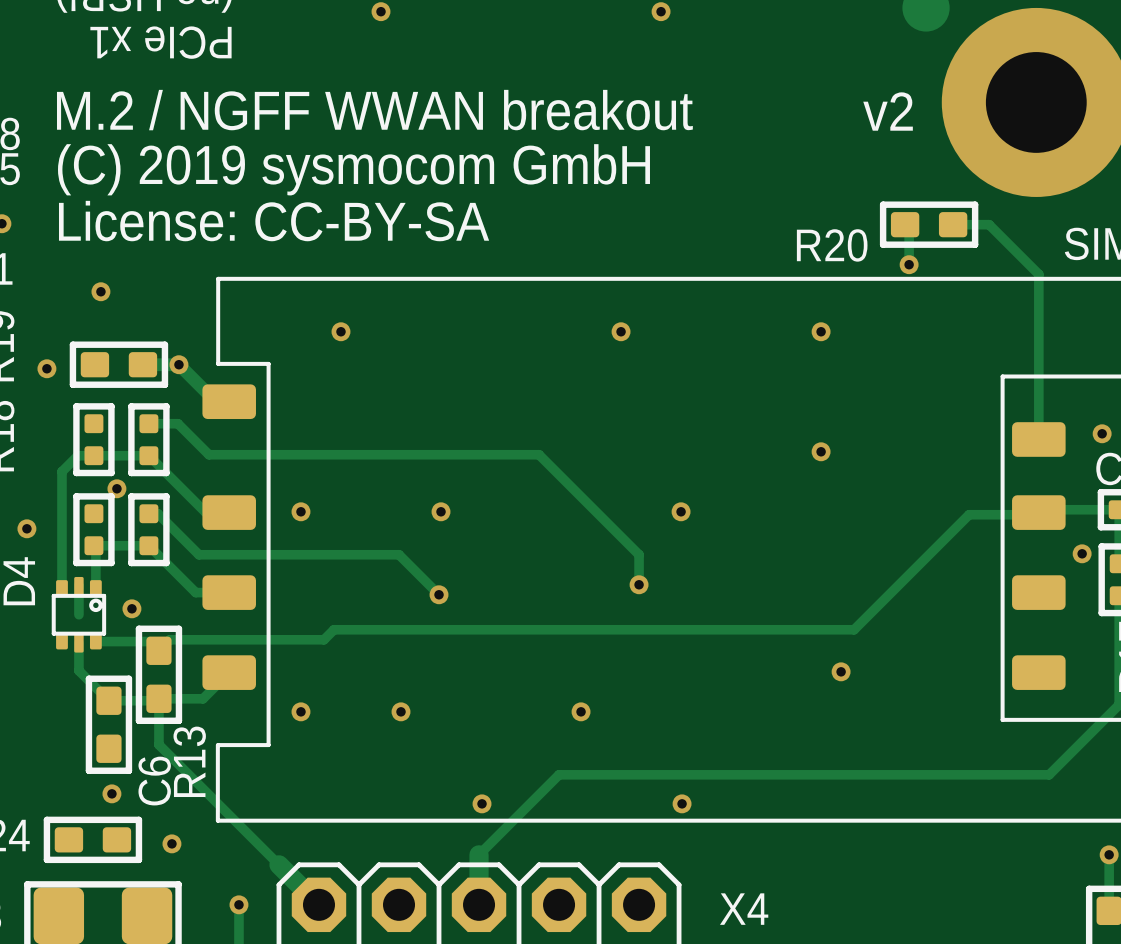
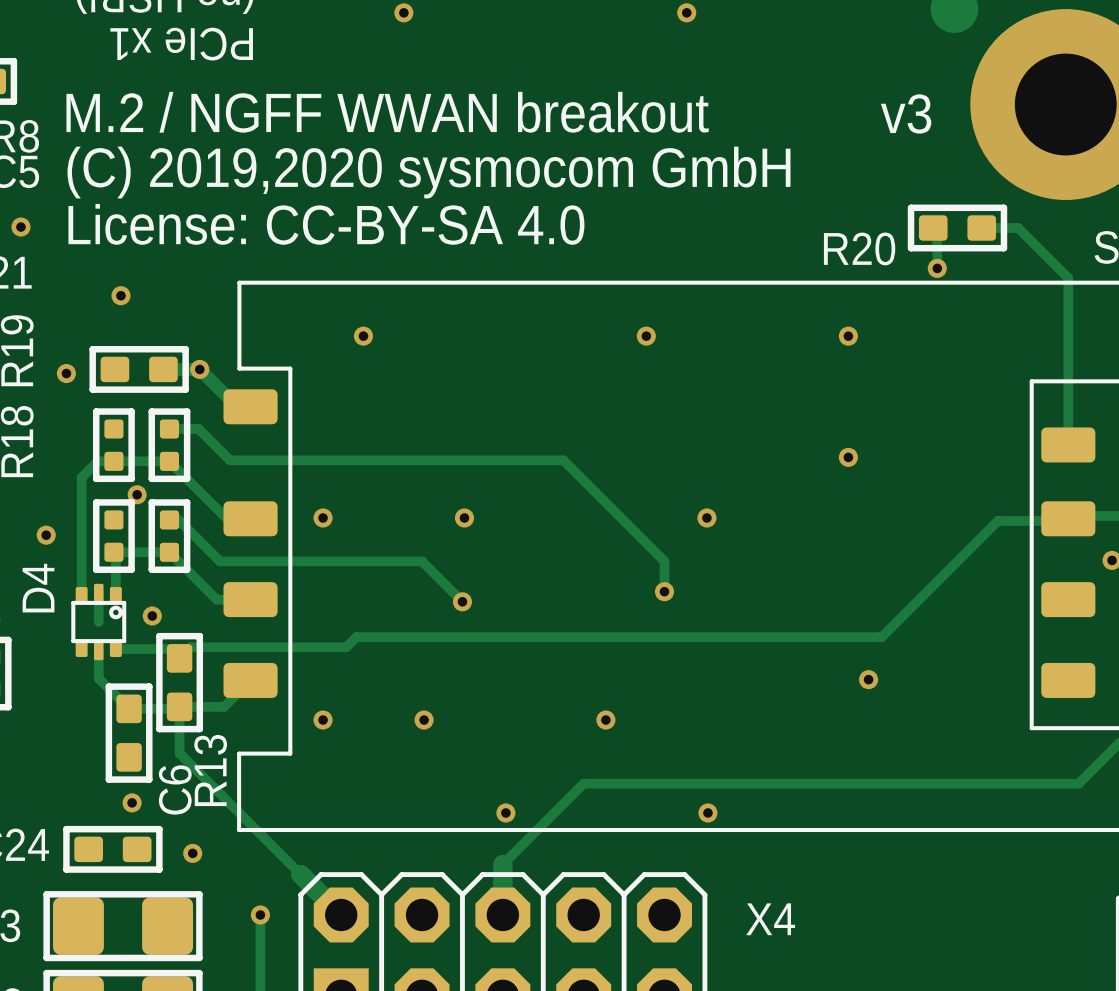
text: none -> M.2 / NGFF WWAN breakout (387, 112)
text: M.2 / NGFF WWAN breakout (374, 110) -> none
text: v2 (888, 111) -> v3 (906, 113)
text: (C) 2019 sysmocom GmbH (353, 169) -> none
text: none -> (C) 2019,2020 sysmocom GmbH (428, 172)
text: License: CC-BY-SA (274, 221) -> none
text: none -> License: CC-BY-SA 4.0 (326, 224)

